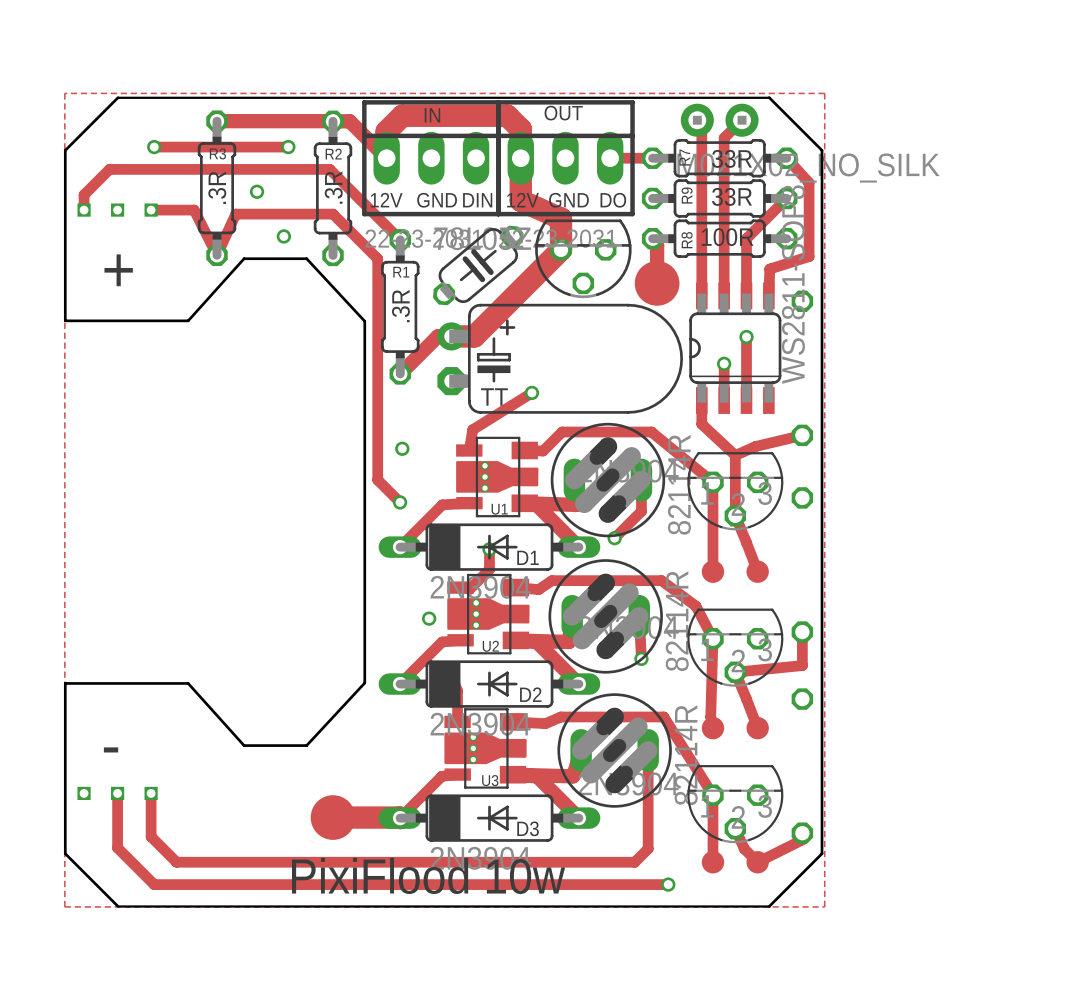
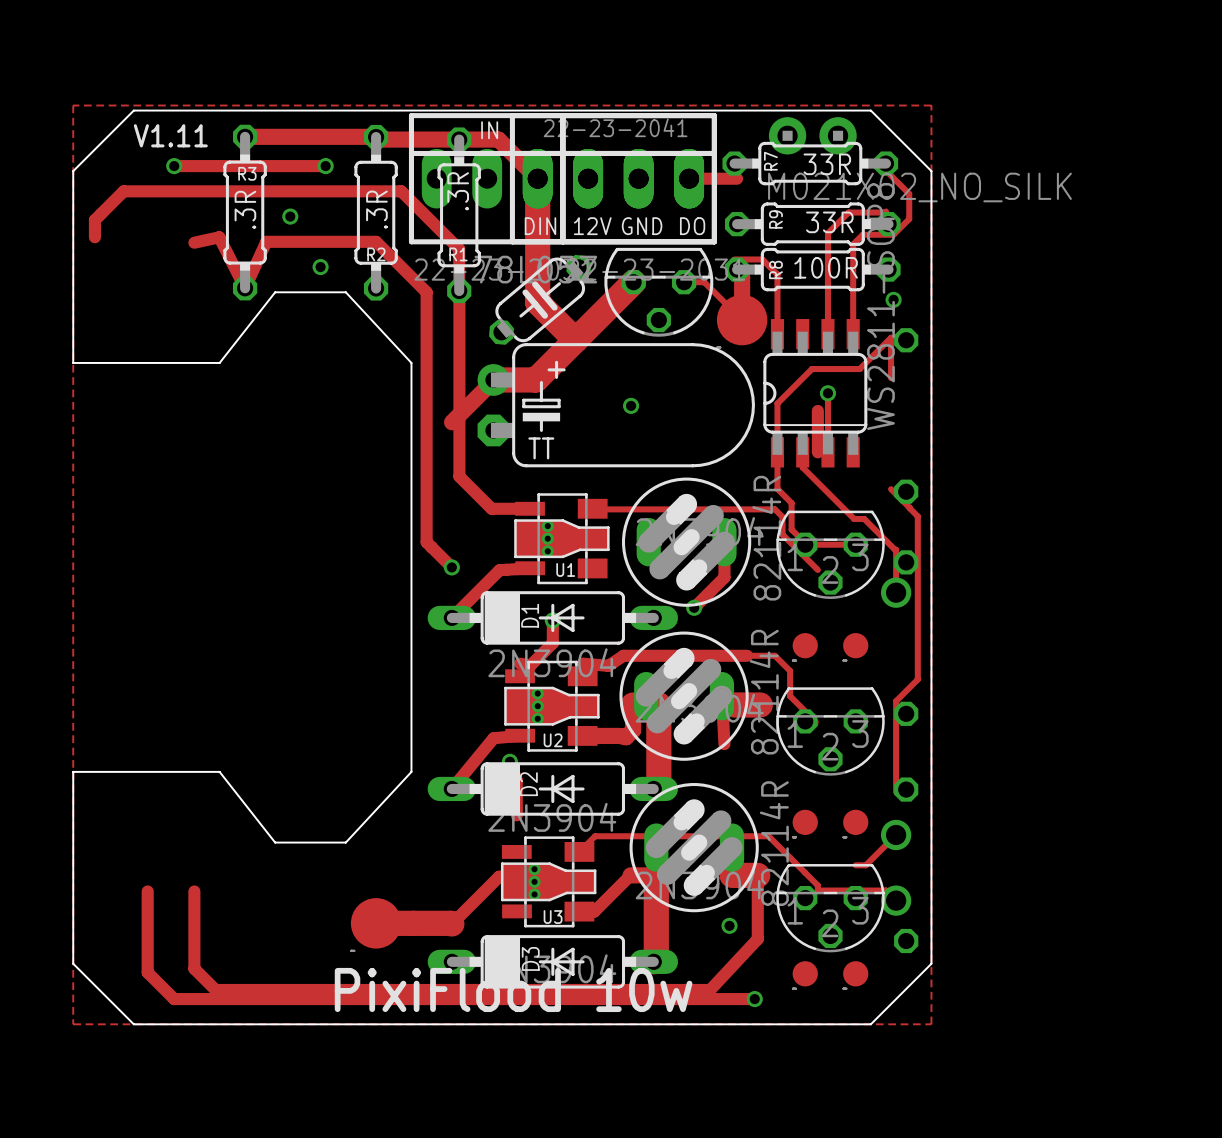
board edge: none -> (133, 110) (870, 110) (931, 171) (931, 963) (870, 1024) (133, 1024) (73, 963) (73, 771) (219, 771) (275, 842) (345, 842) (411, 771) (411, 362) (345, 292) (275, 292) (219, 362) (73, 362) (73, 171) (133, 110)
text: OUT (563, 113) -> none
text: none -> V1.11 (170, 135)
track: (697, 120) (701, 124) (701, 295) -> none
track: (742, 120) (724, 138) (724, 295) -> none
track: (333, 121) (349, 121) (386, 158) (386, 131) (402, 115) (507, 115) (520, 129) (520, 200) (561, 218) (561, 249) -> (376, 137) (378, 139) (498, 139) (537, 178) (537, 302) (575, 340)
track: none -> (886, 163) (886, 170) (909, 193) (909, 219) (893, 234) (862, 234) (853, 244) (853, 334)
R2 name position: R2 (333, 154) -> R2 (376, 254)
part: none -> 22-23-2041 (613, 178)
R7 position: (719, 158) -> (810, 163)
track: (786, 158) (809, 182) (809, 256) (769, 269) (768, 295) -> none
track: (329, 169) (400, 239) -> (372, 191) (401, 191) (459, 249) (459, 476) (491, 508) (530, 508)
track: none -> (886, 211) (848, 212) (827, 233) (827, 334)
track: (786, 198) (746, 238) (746, 295) -> none
text: 12V (386, 200) -> none
text: GND (437, 200) -> none
track: (151, 210) (194, 210) -> (194, 242) (219, 237)
track: none -> (734, 259) (762, 259) (777, 274) (777, 334)
track: none -> (684, 282) (704, 282) (739, 317)
via: none -> (893, 299)
R1 name position: R1 (401, 272) -> R1 (458, 254)
R1 position: (400, 306) -> (459, 215)
R1 value position: .3R (400, 306) -> .3R (458, 191)
track: none -> (891, 378) (891, 337) (859, 369) (812, 369) (777, 403) (777, 488) (791, 503) (791, 529) (806, 544) (855, 544)
track: (746, 337) (746, 400) -> none
via position: (746, 337) -> (827, 393)
track: none -> (827, 393) (827, 452)
part position: (735, 348) -> (815, 393)
part position: (560, 358) -> (616, 405)
via: (724, 363) -> none
track: (531, 392) (472, 429) (469, 450) -> none
via position: (531, 392) -> (631, 405)
track: (701, 400) (701, 424) (735, 455) -> none
track: none -> (802, 452) (802, 467) (854, 519) (864, 519) (896, 549) (896, 592)
track: none -> (891, 489) (917, 516) (917, 679) (896, 701) (896, 792)
track: (802, 435) (755, 446) (735, 455) -> none
U1 footprint: [456, 436, 539, 518] -> [514, 493, 610, 585]
via: (402, 448) -> none
track: (524, 450) (543, 451) (562, 432) (651, 432) (712, 482) (712, 571) -> (592, 508) (774, 509) (782, 516) (782, 534) (817, 569)
track: (735, 455) (735, 515) (757, 571) -> none
track: (574, 480) (576, 504) (524, 503) (536, 504) (578, 547) -> none
part: (443, 502) -> none
part: none -> (896, 592)
D1 name rotation: 0° (528, 557) -> 90° counterclockwise (530, 615)
D1 name position: D1 (528, 557) -> D1 (530, 615)
U2 footprint: [447, 573, 530, 655] -> [504, 660, 600, 752]
track: (661, 580) (695, 606) (712, 638) (710, 716) (712, 728) -> (747, 655) (774, 655) (790, 670) (790, 696) (815, 721) (815, 723)
track: (572, 616) (568, 642) (515, 640) (536, 642) (578, 684) -> none
via: (429, 618) -> none
track: none -> (734, 705) (760, 705)
track: (802, 632) (802, 665) (735, 672) (757, 728) -> none
track: (460, 640) (442, 642) (400, 684) -> none
track: none -> (520, 735) (493, 738) (451, 788)
track: none -> (582, 735) (626, 737) (633, 730) (633, 705) (658, 705) (658, 783) (653, 788)
via: (641, 658) -> none
D2 position: (489, 684) -> (552, 788)
D2 name rotation: 0° (530, 694) -> 90° counterclockwise (528, 784)
D2 name position: D2 (530, 694) -> D2 (528, 784)
U3 footprint: [444, 708, 527, 789] -> [500, 836, 597, 928]
track: (513, 721) (545, 723) (561, 716) (663, 716) (712, 795) (712, 862) -> none
track: none -> (896, 834) (865, 865) (855, 865)
part: none -> (896, 834)
track: (581, 750) (573, 776) (513, 774) (537, 776) (578, 818) -> none
track: (648, 750) (648, 848) (634, 862) (176, 862) -> (732, 875) (757, 875) (757, 939) (710, 989) (215, 989) (199, 973)
track: none -> (579, 851) (595, 836) (768, 836) (817, 885) (817, 890) (886, 890) (896, 900)
track: (117, 793) (117, 847) (130, 861) -> (147, 891) (147, 972)
track: (151, 793) (151, 836) (172, 857) -> (194, 891) (194, 968)
part: none -> (896, 900)
track: none -> (579, 911) (594, 911) (630, 875) (656, 875) (656, 959) (653, 961)
D3 position: (489, 818) -> (552, 961)
via: none -> (729, 925)
D3 name rotation: 0° (528, 828) -> 90° counterclockwise (530, 958)
D3 name position: D3 (528, 828) -> D3 (530, 958)
track: (735, 828) (744, 848) (757, 862) (802, 839) (802, 833) -> none

